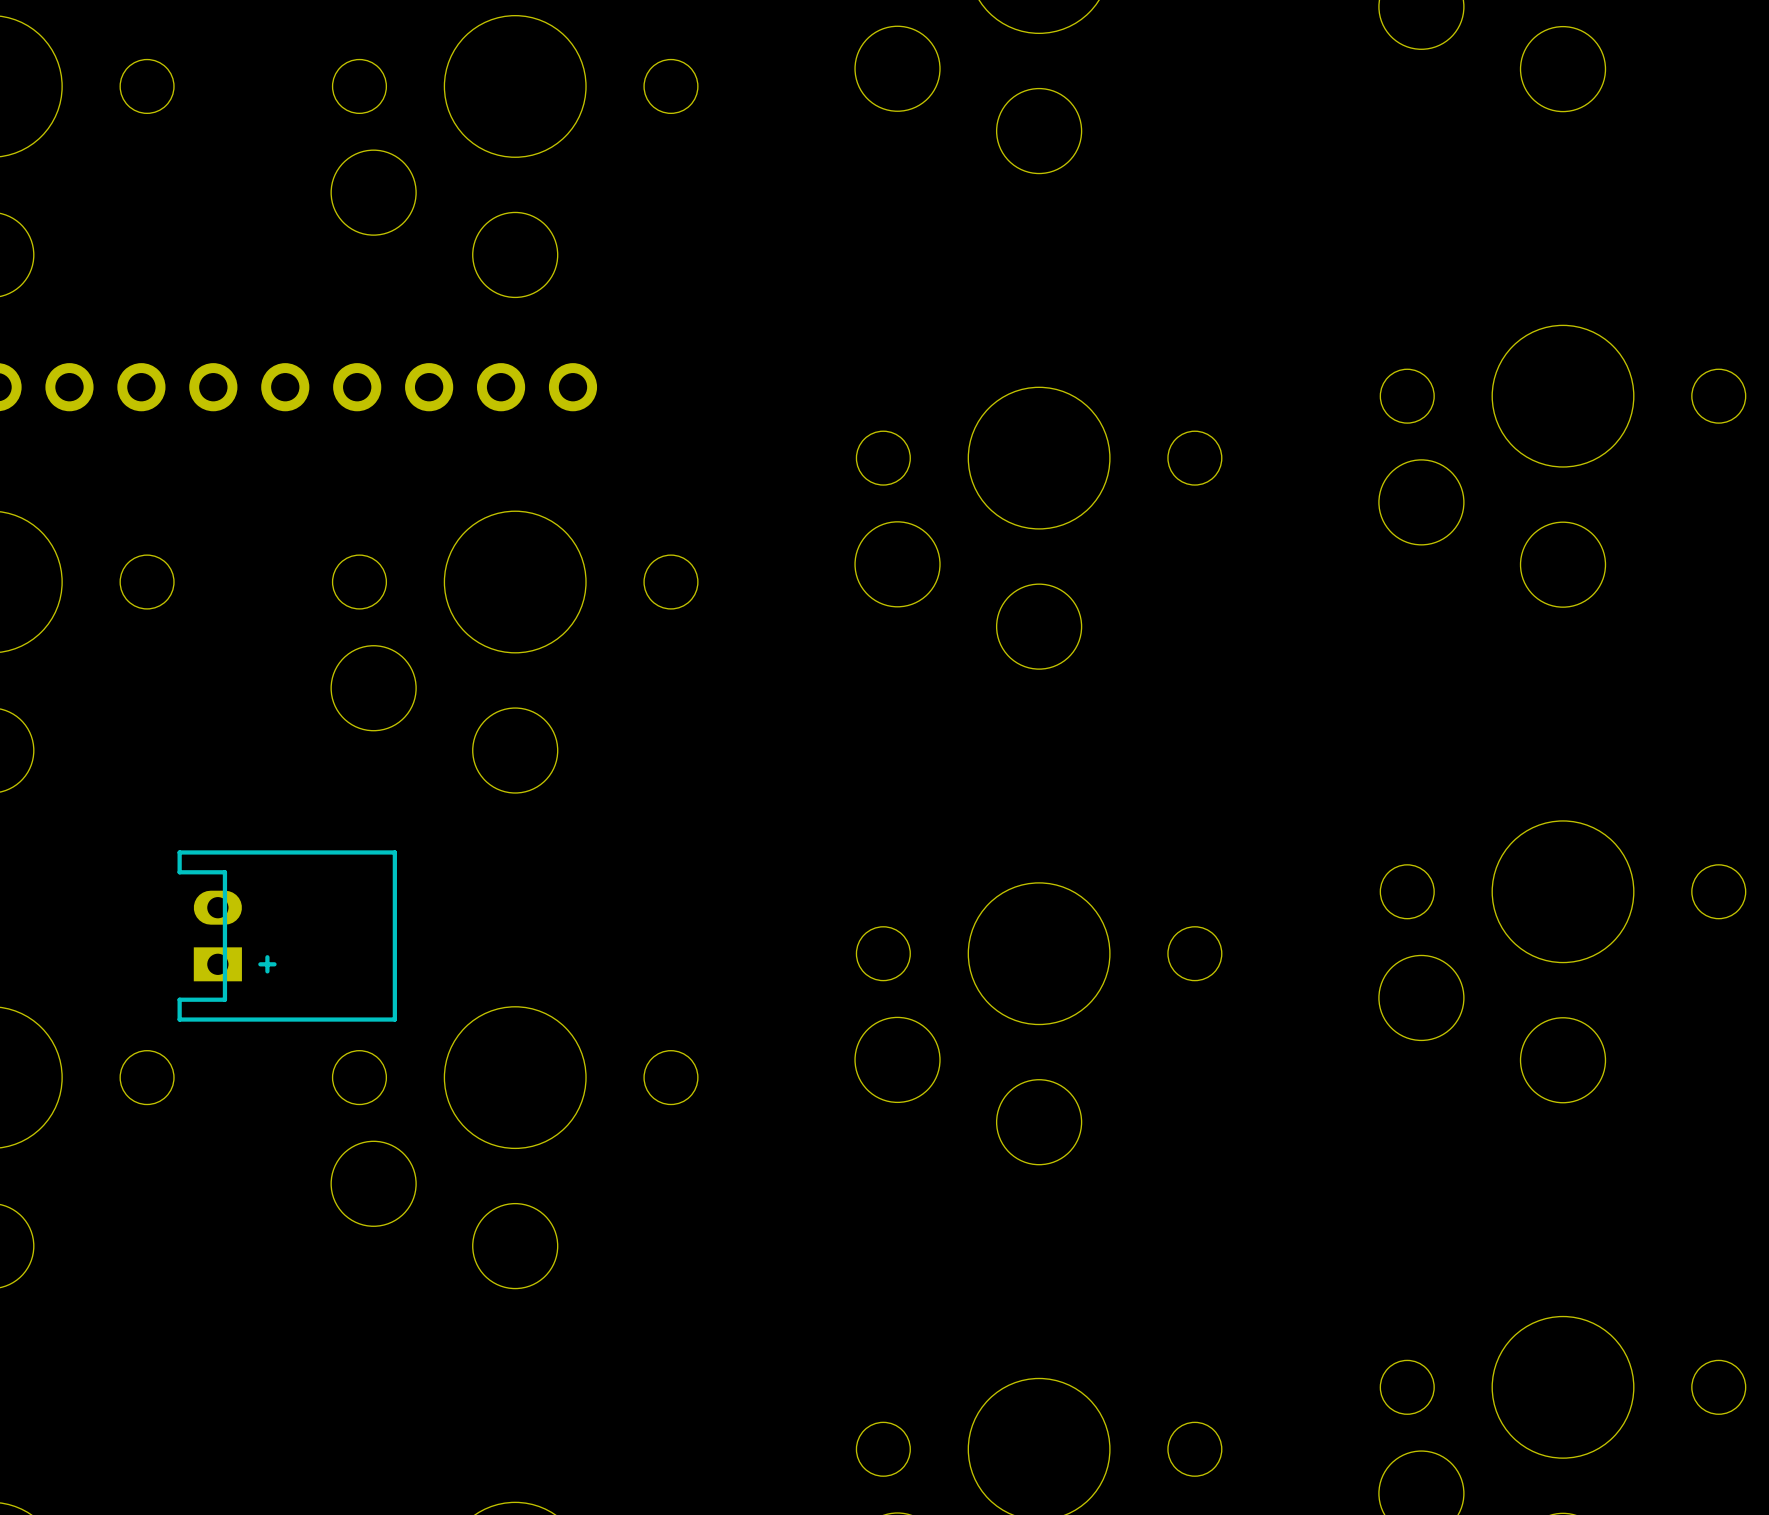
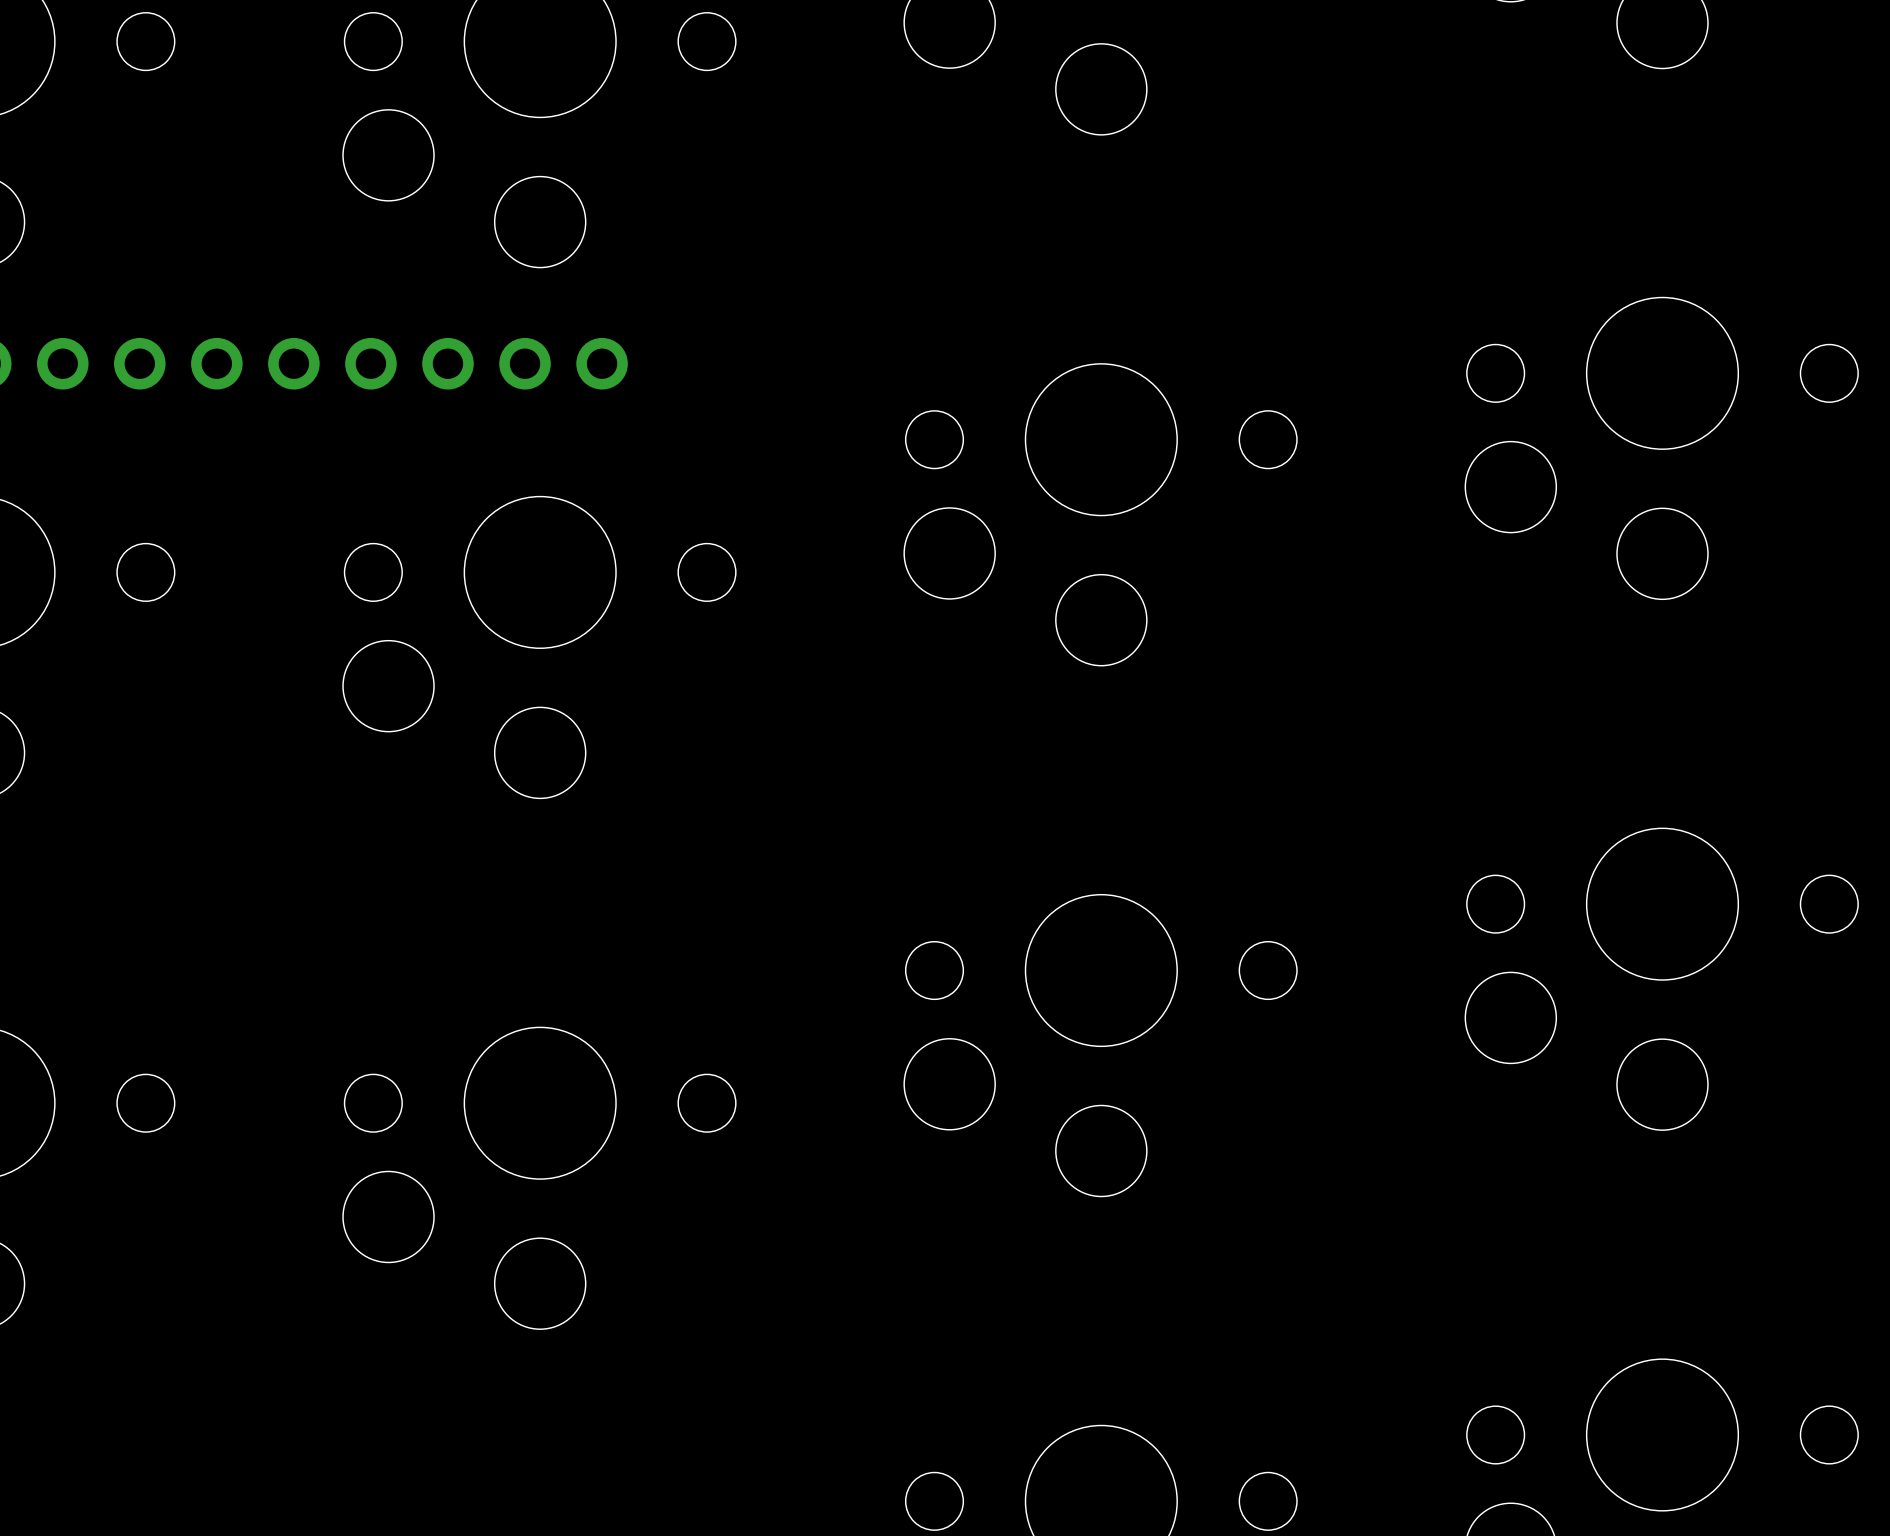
part: (287, 936) -> none

